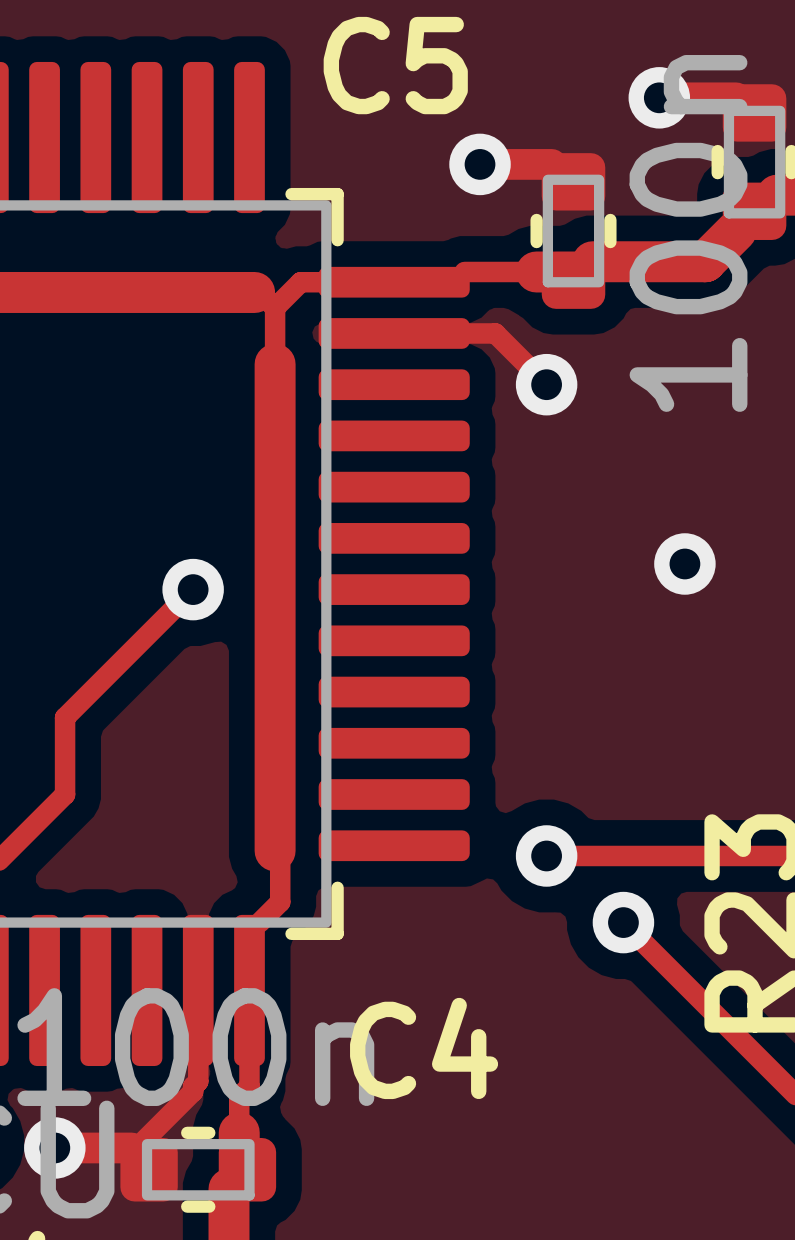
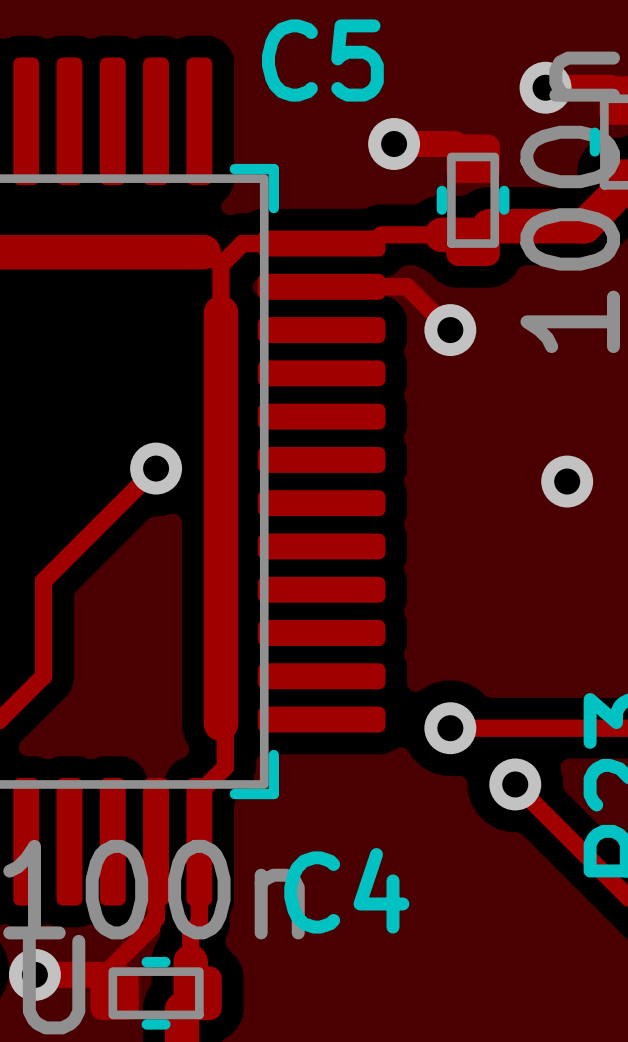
track: (193, 589) (65, 717) -> (156, 468) (43, 581) (43, 611)
via position: (193, 589) -> (156, 468)

